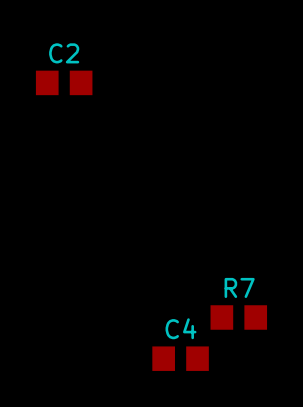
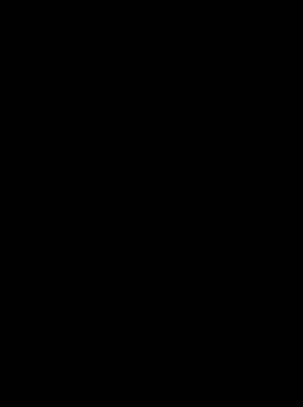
C2: (64, 82) -> none
R7: (238, 317) -> none
C4: (180, 358) -> none

